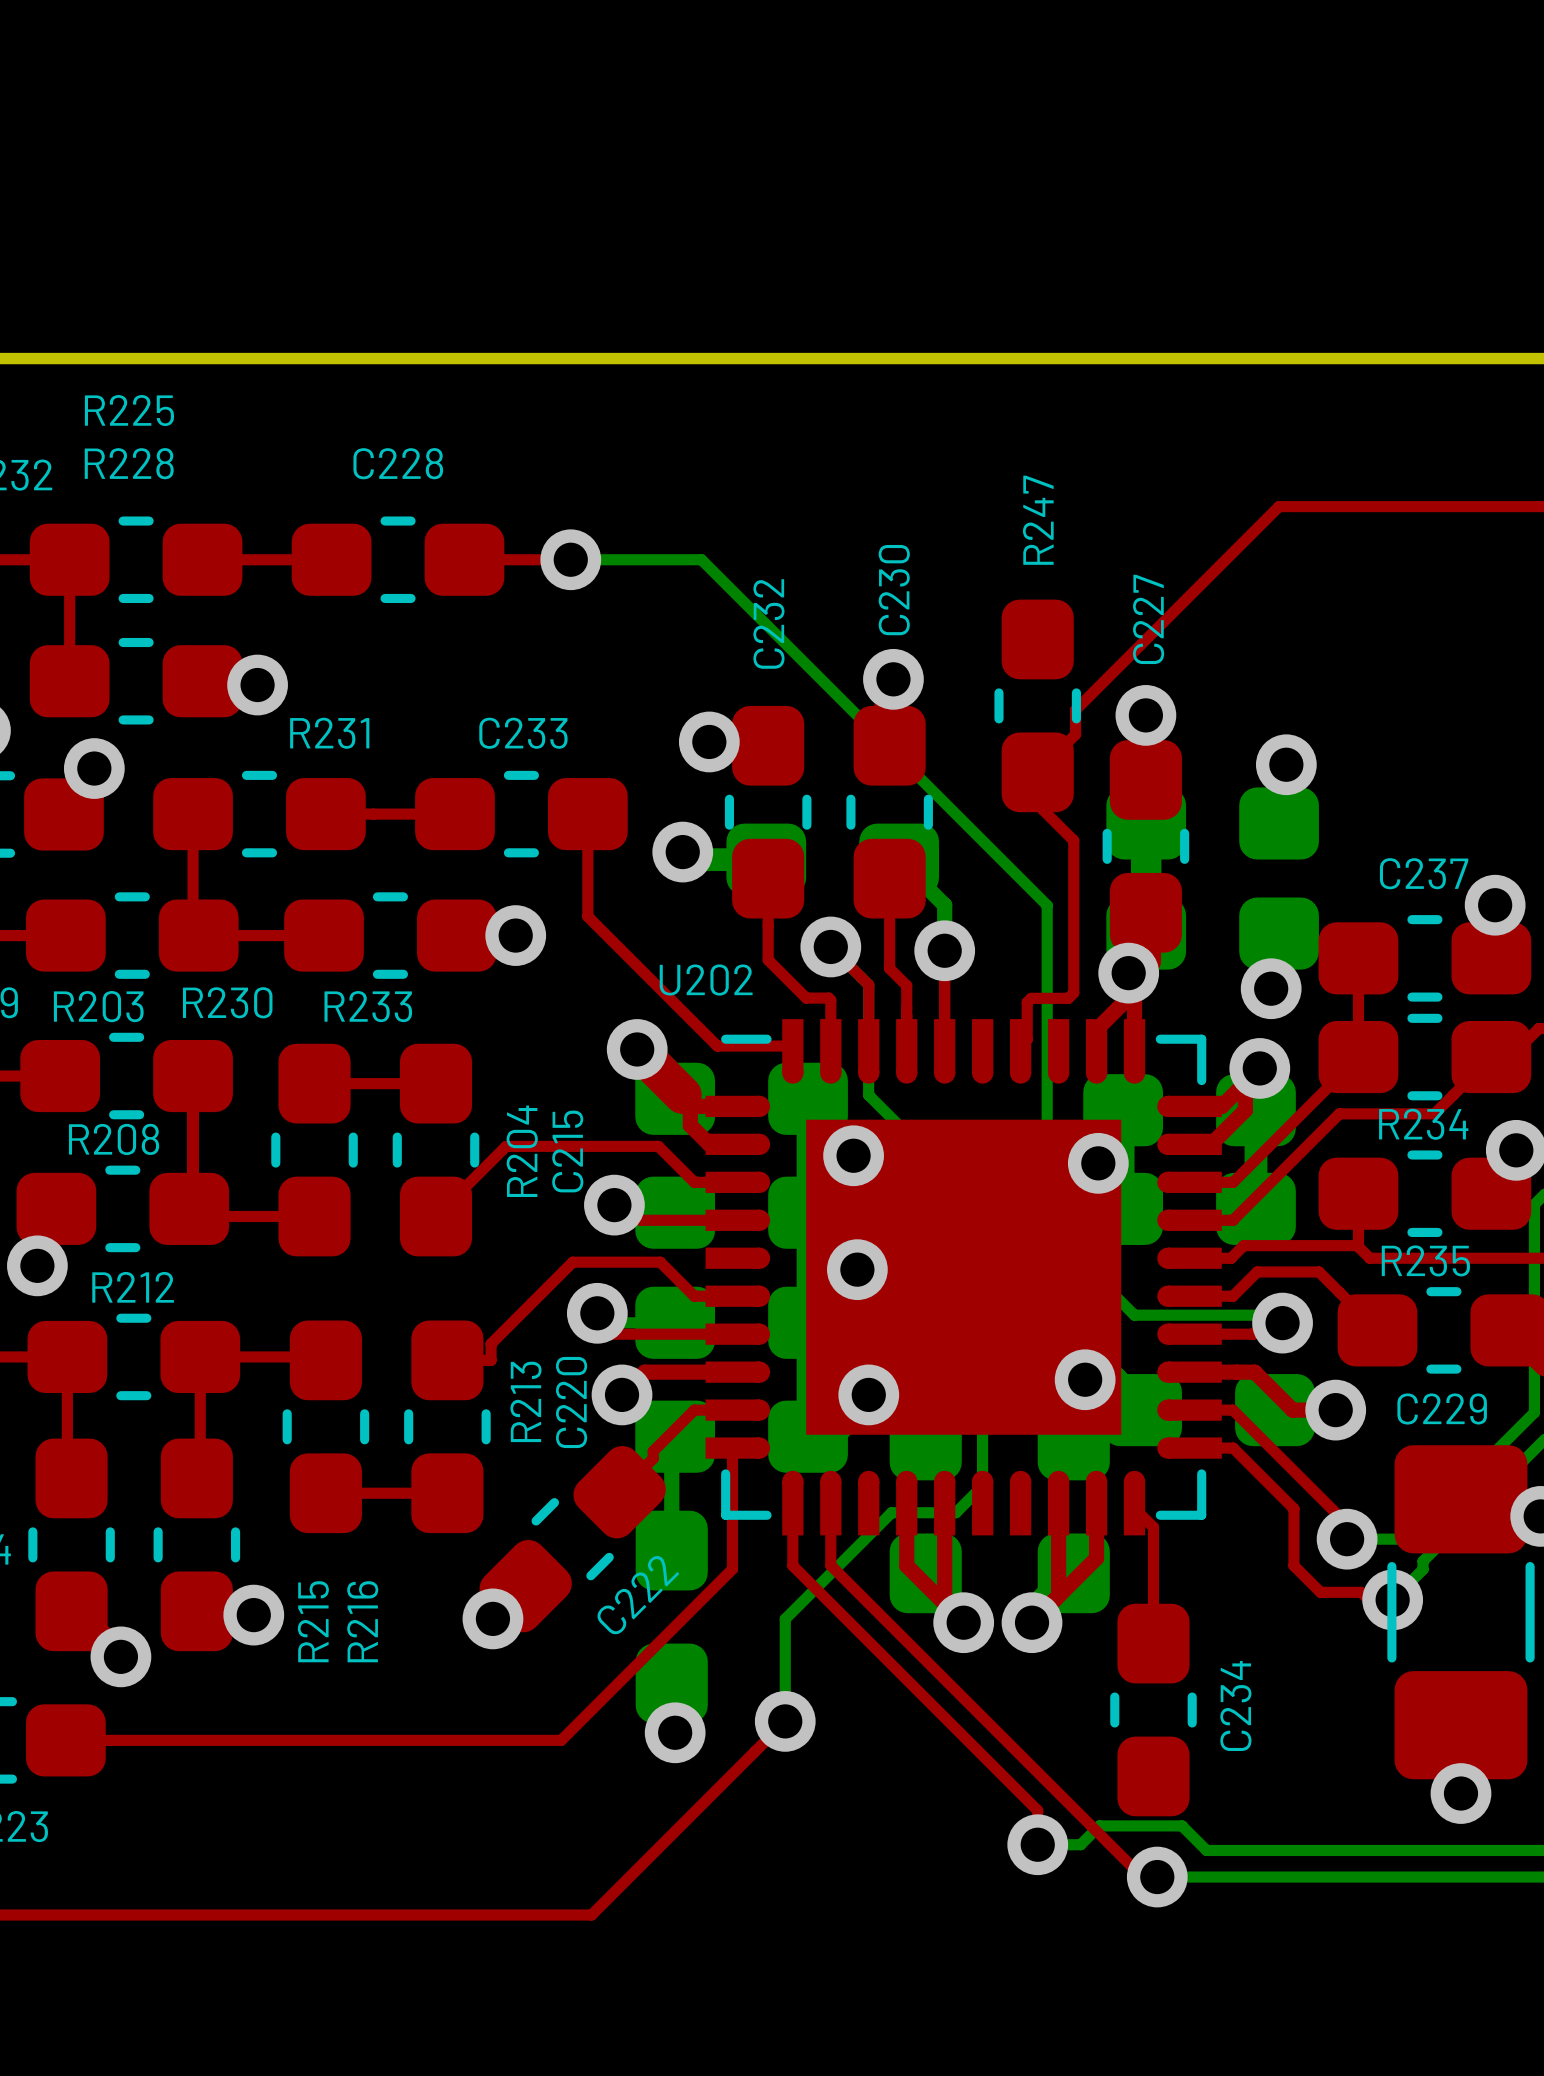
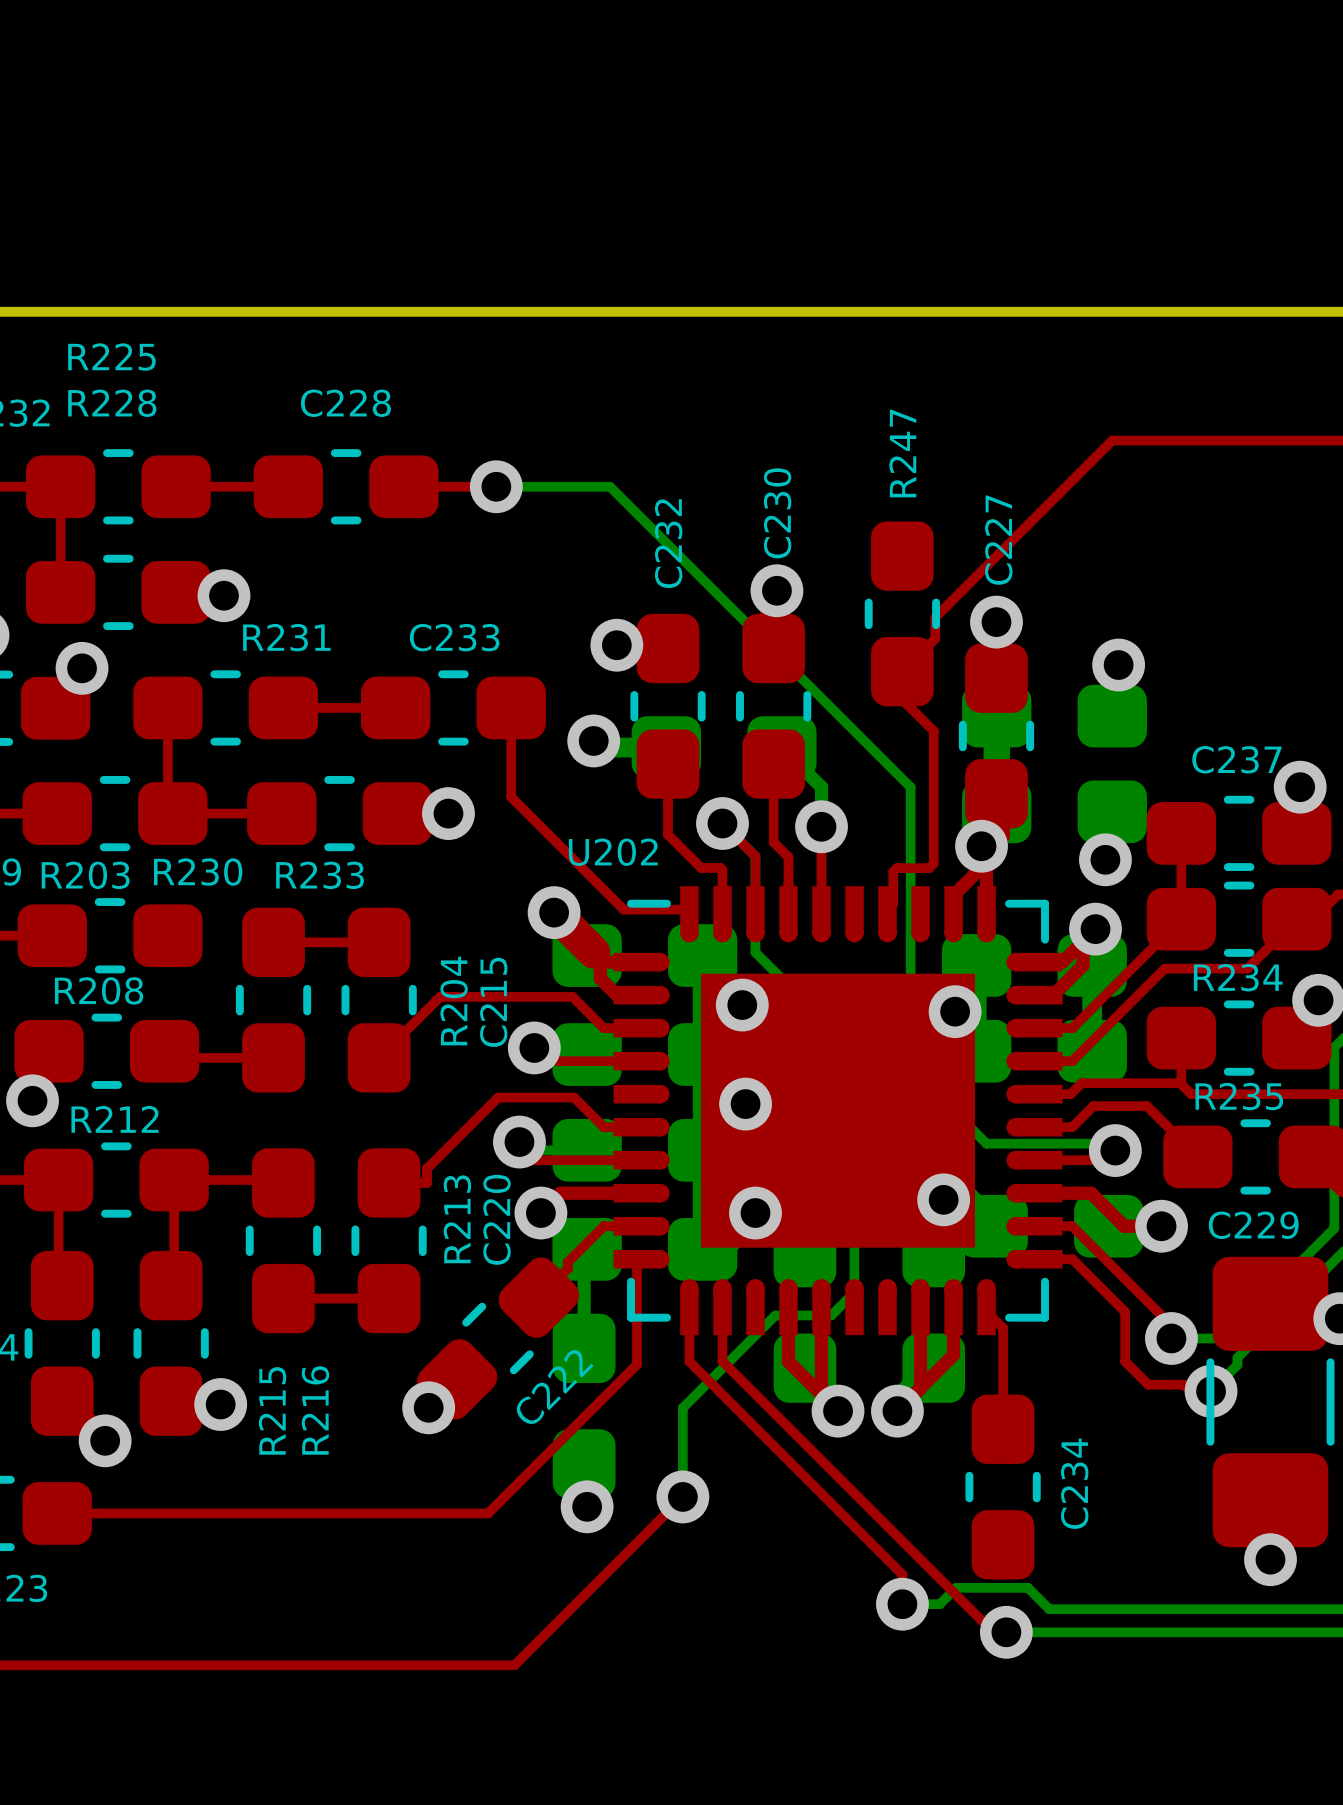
top track: (193, 1076) (193, 1205) (189, 1208) -> none

